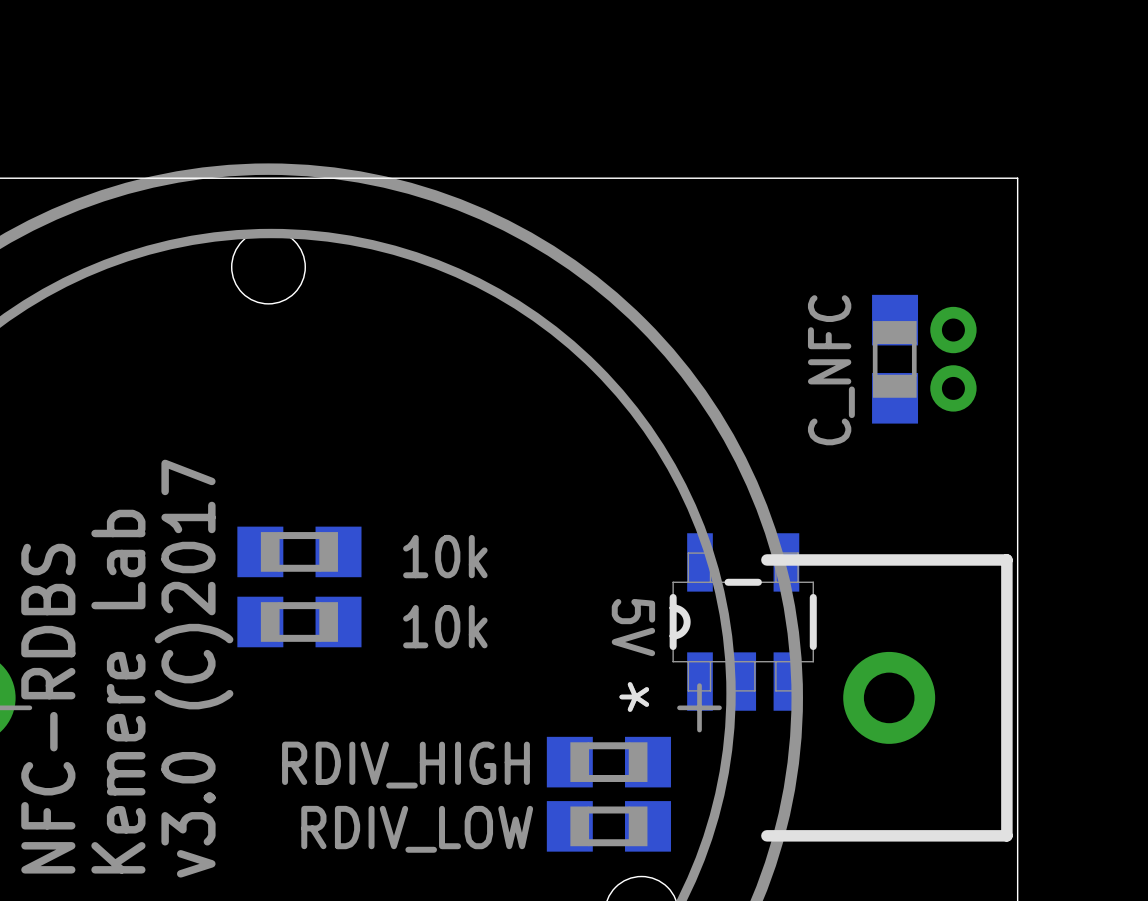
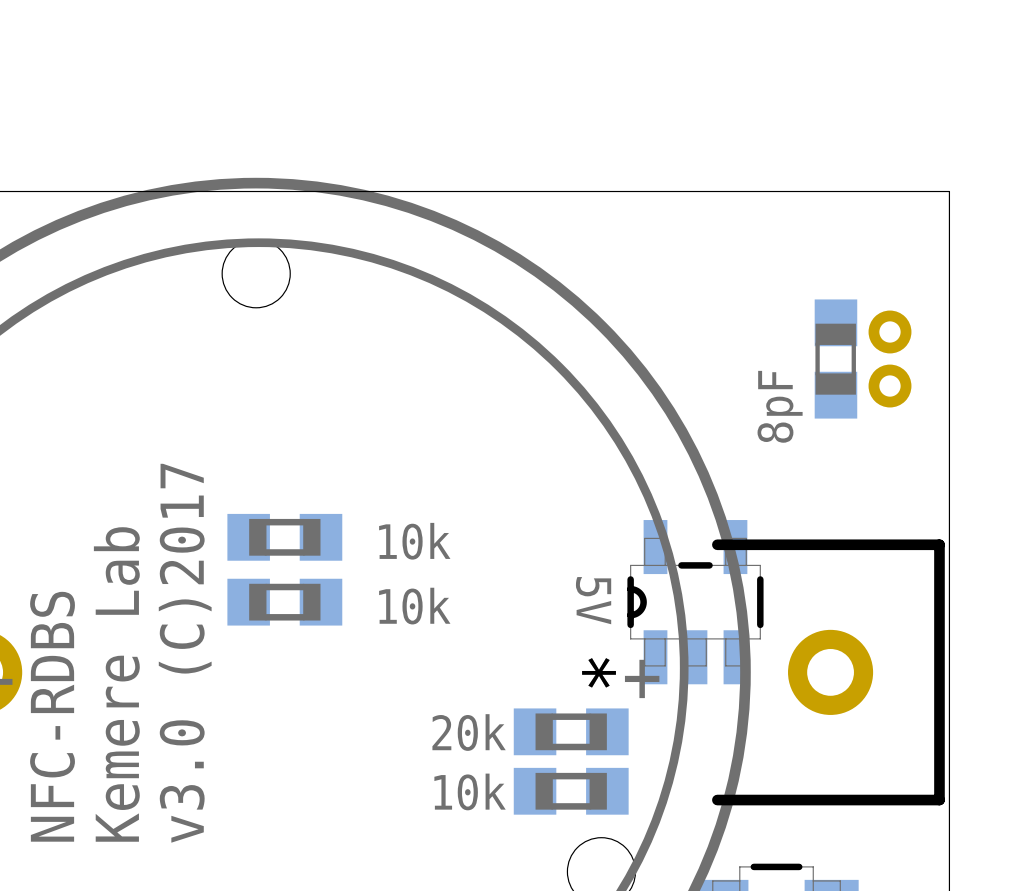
part value: C_NFC (831, 370) -> 8pF (780, 406)
part value: RDIV_HIGH (405, 765) -> 20k (469, 732)
part value: RDIV_LOW (417, 829) -> 10k (470, 791)

